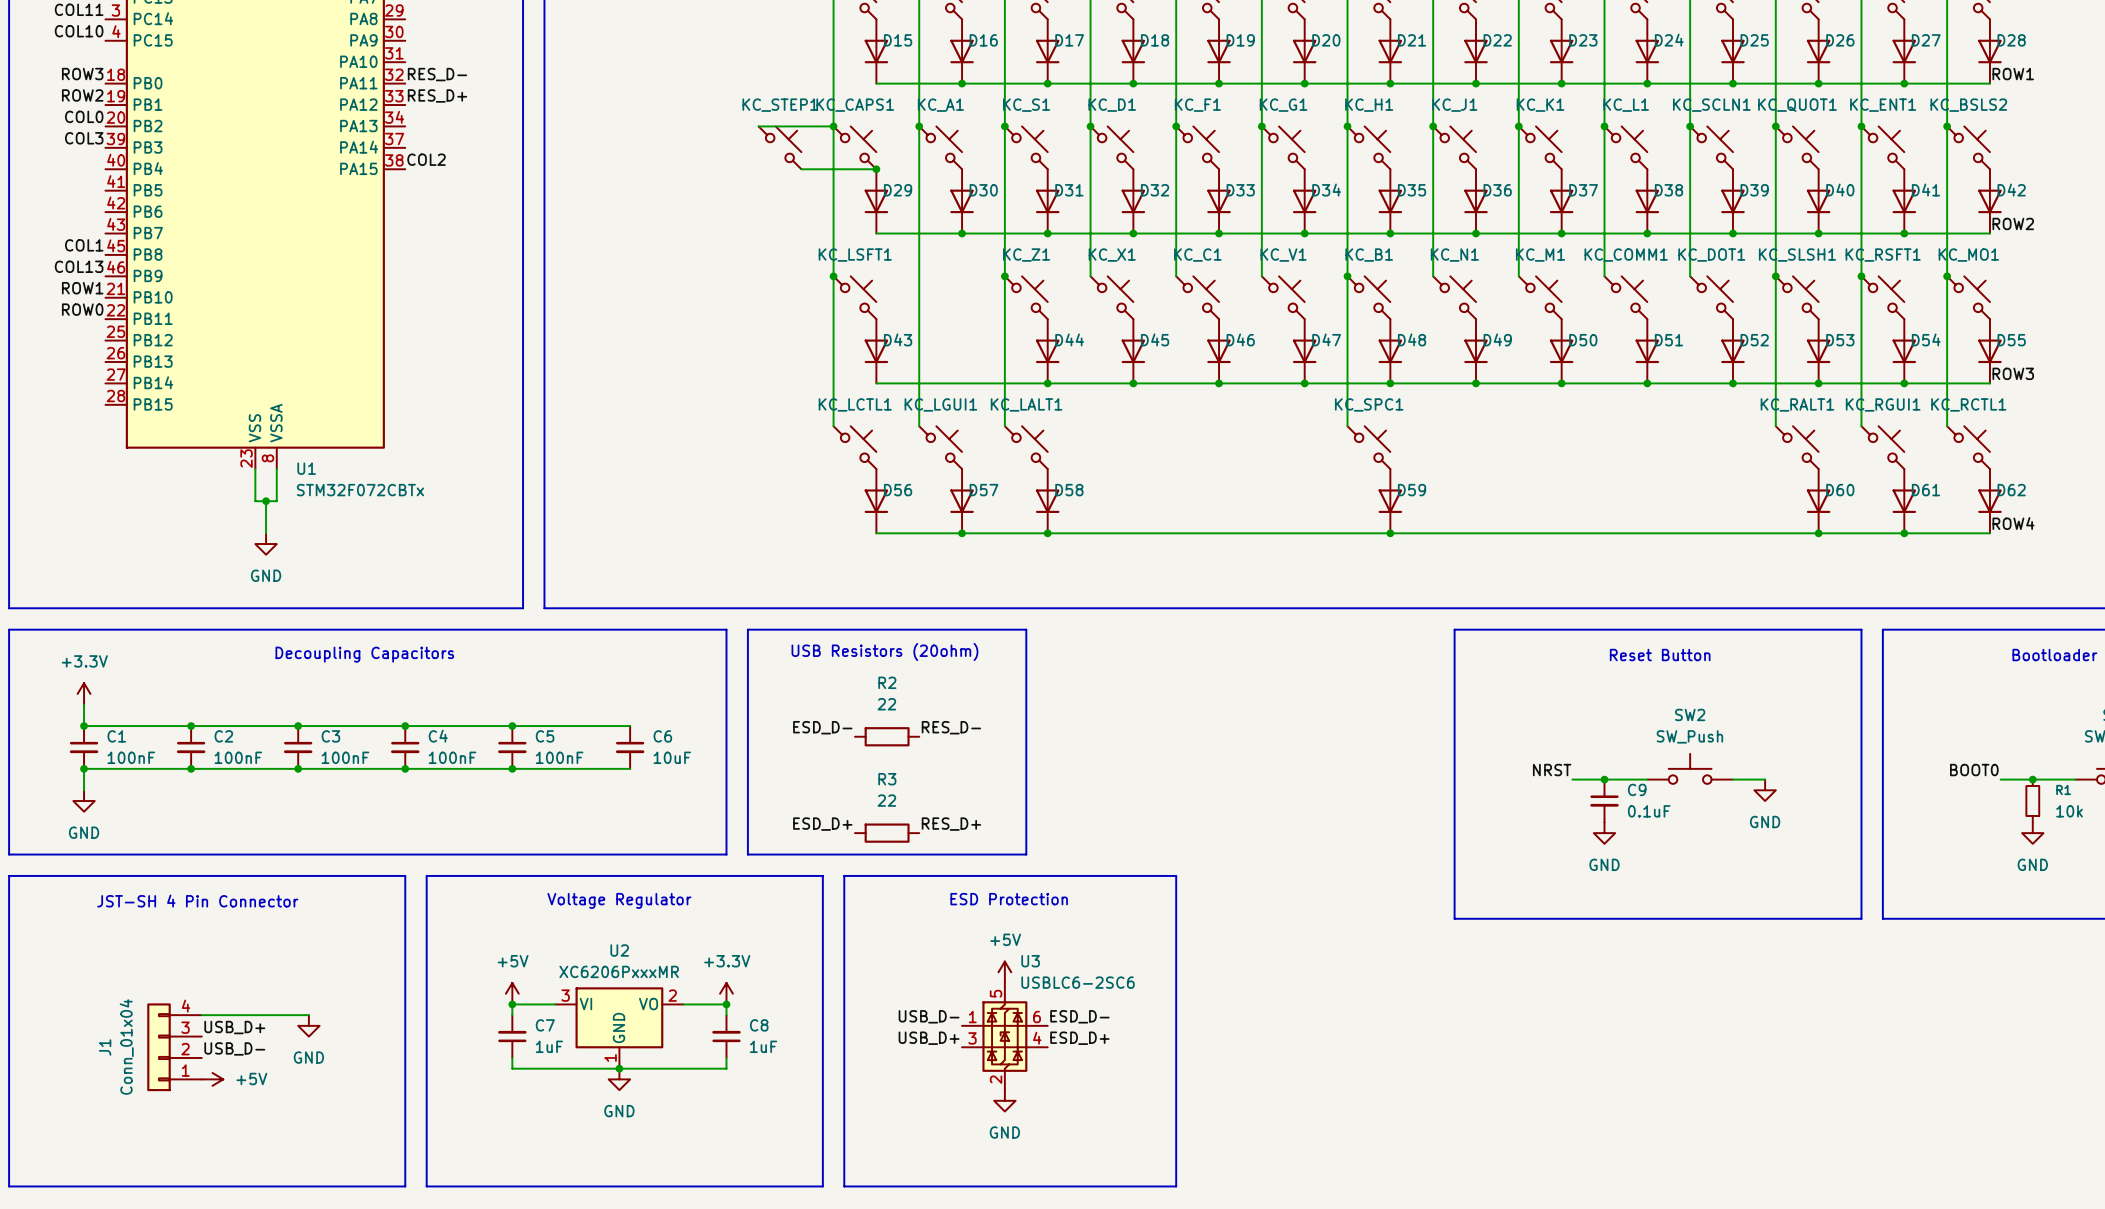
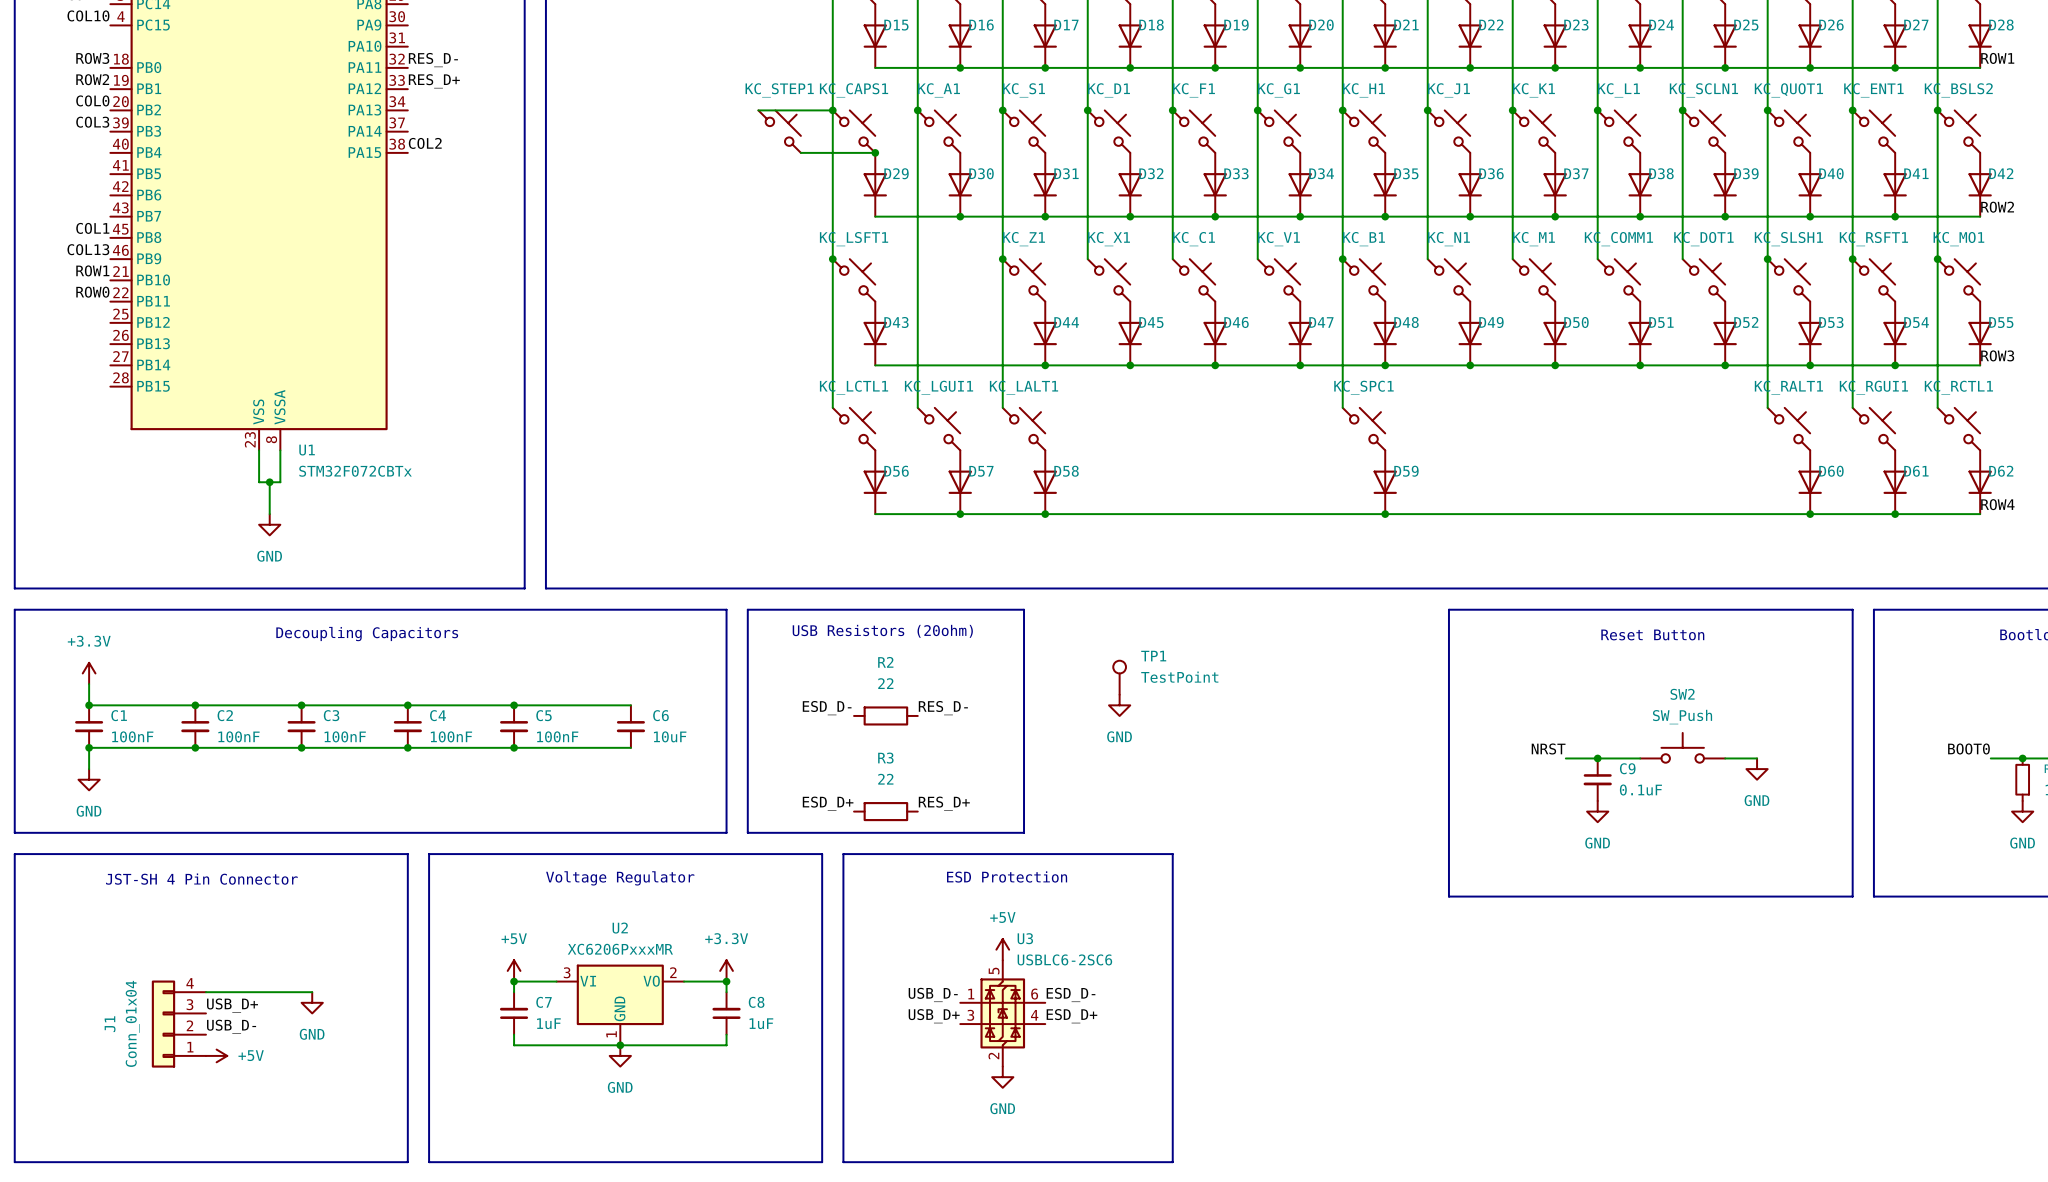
TP1: none -> TestPoint (1119, 677)
power symbol: none -> GND (1119, 705)

